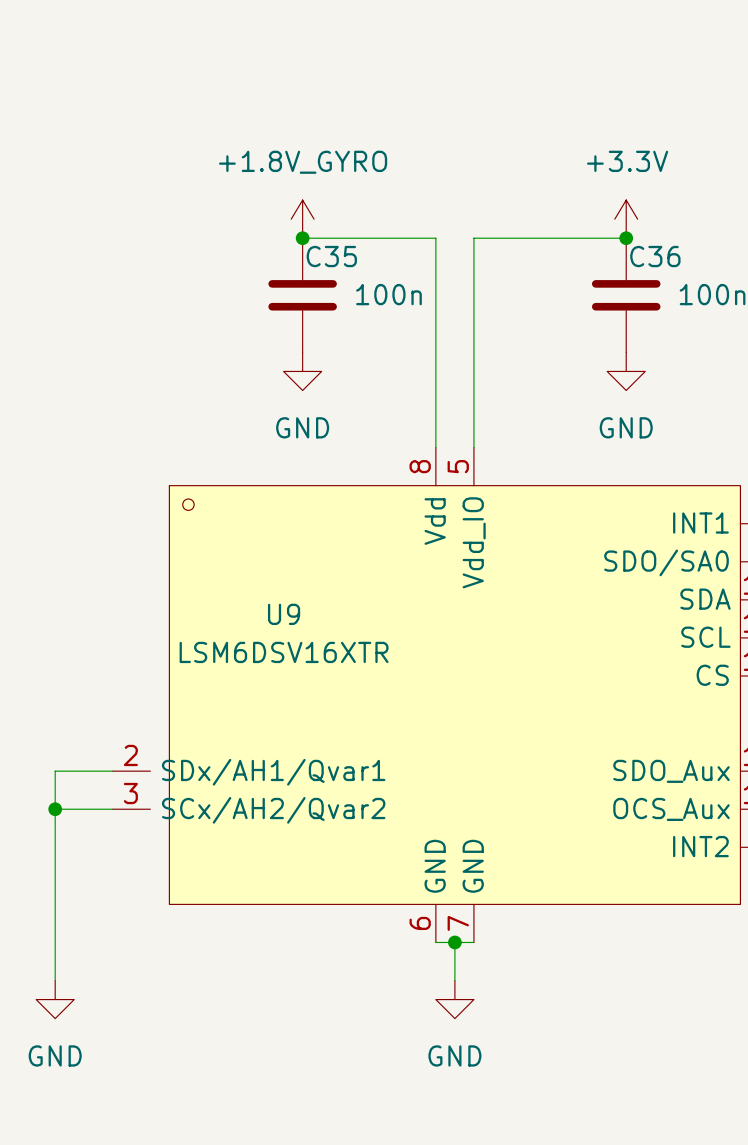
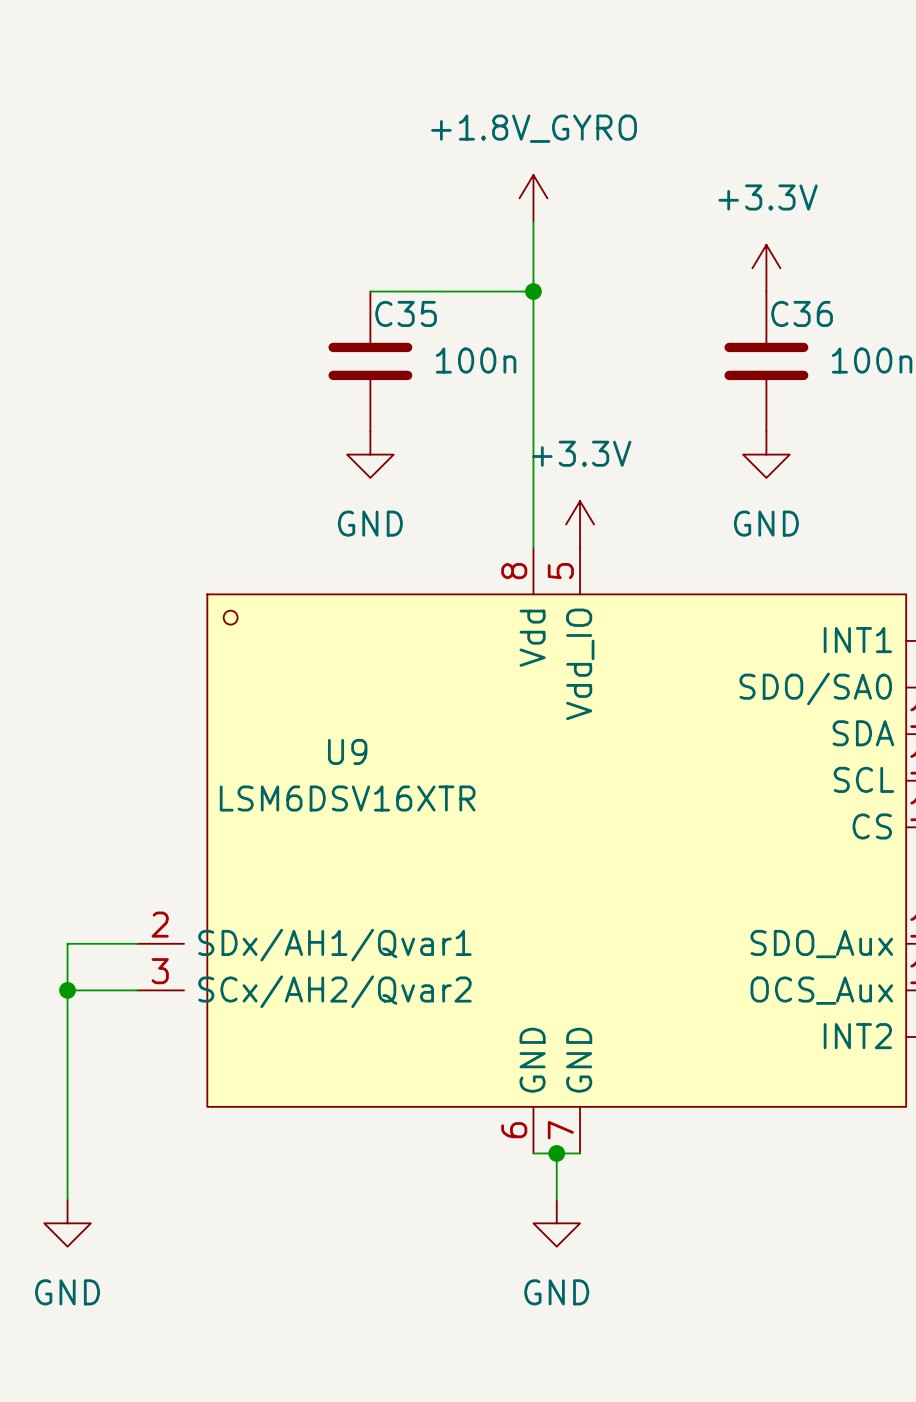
wire: none -> (533, 221) (533, 291)
power symbol position: +1.8V_GYRO (302, 219) -> +1.8V_GYRO (533, 198)
junction: (302, 238) -> none
junction: none -> (533, 291)
wire: (626, 238) (473, 238) (473, 447) -> none
junction: (626, 238) -> none
power symbol: none -> +3.3V (580, 524)

